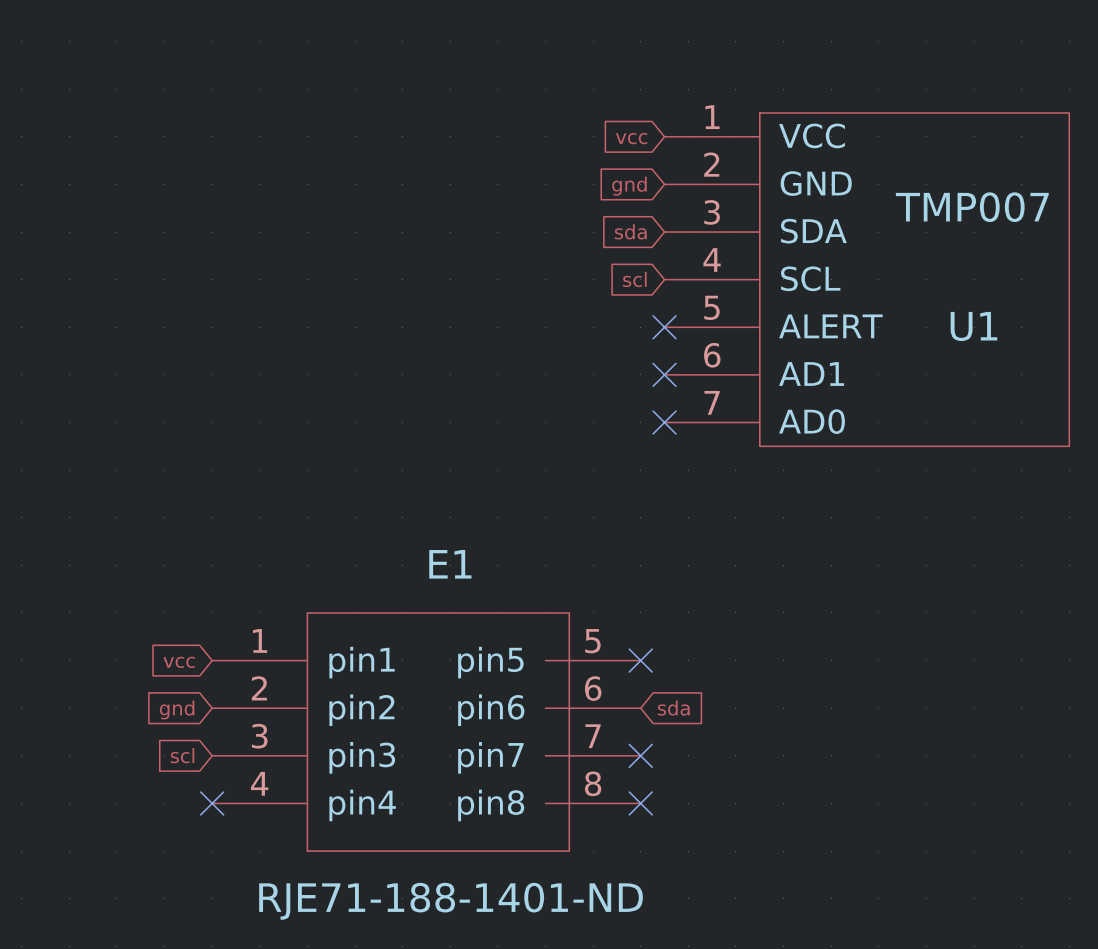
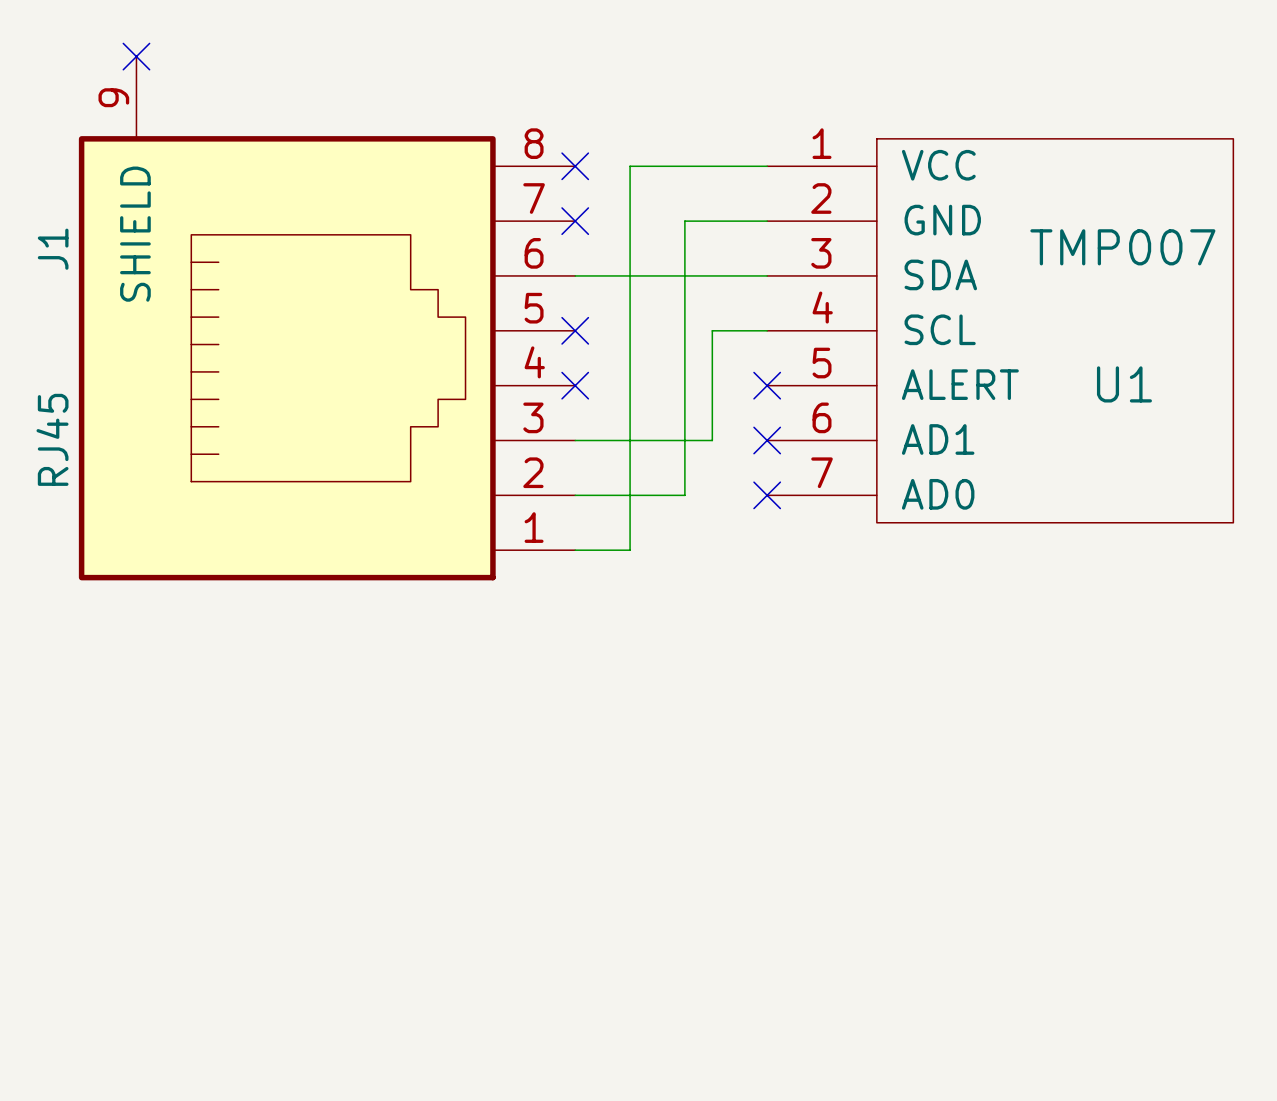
no-connect mark: none -> (136, 56)
no-connect mark: none -> (575, 166)
wire: none -> (767, 166) (630, 166) (630, 550) (575, 550)
global label: vcc (631, 138) -> none
no-connect mark: none -> (575, 221)
wire: none -> (767, 221) (684, 221) (684, 495) (575, 495)
global label: gnd (629, 186) -> none
global label: sda (630, 231) -> none
wire: none -> (575, 275) (767, 275)
J1: none -> RJ45 (327, 318)
no-connect mark: none -> (575, 330)
global label: scl (634, 279) -> none
wire: none -> (767, 330) (712, 330) (712, 440) (575, 440)
no-connect mark: none -> (575, 385)
no-connect mark: (640, 660) -> none
global label: vcc (179, 662) -> none
global label: sda (673, 708) -> none
global label: gnd (177, 709) -> none
E1: RJE71-188-1401-ND (426, 732) -> none
global label: scl (182, 755) -> none
no-connect mark: (640, 755) -> none
no-connect mark: (212, 803) -> none
no-connect mark: (640, 803) -> none

